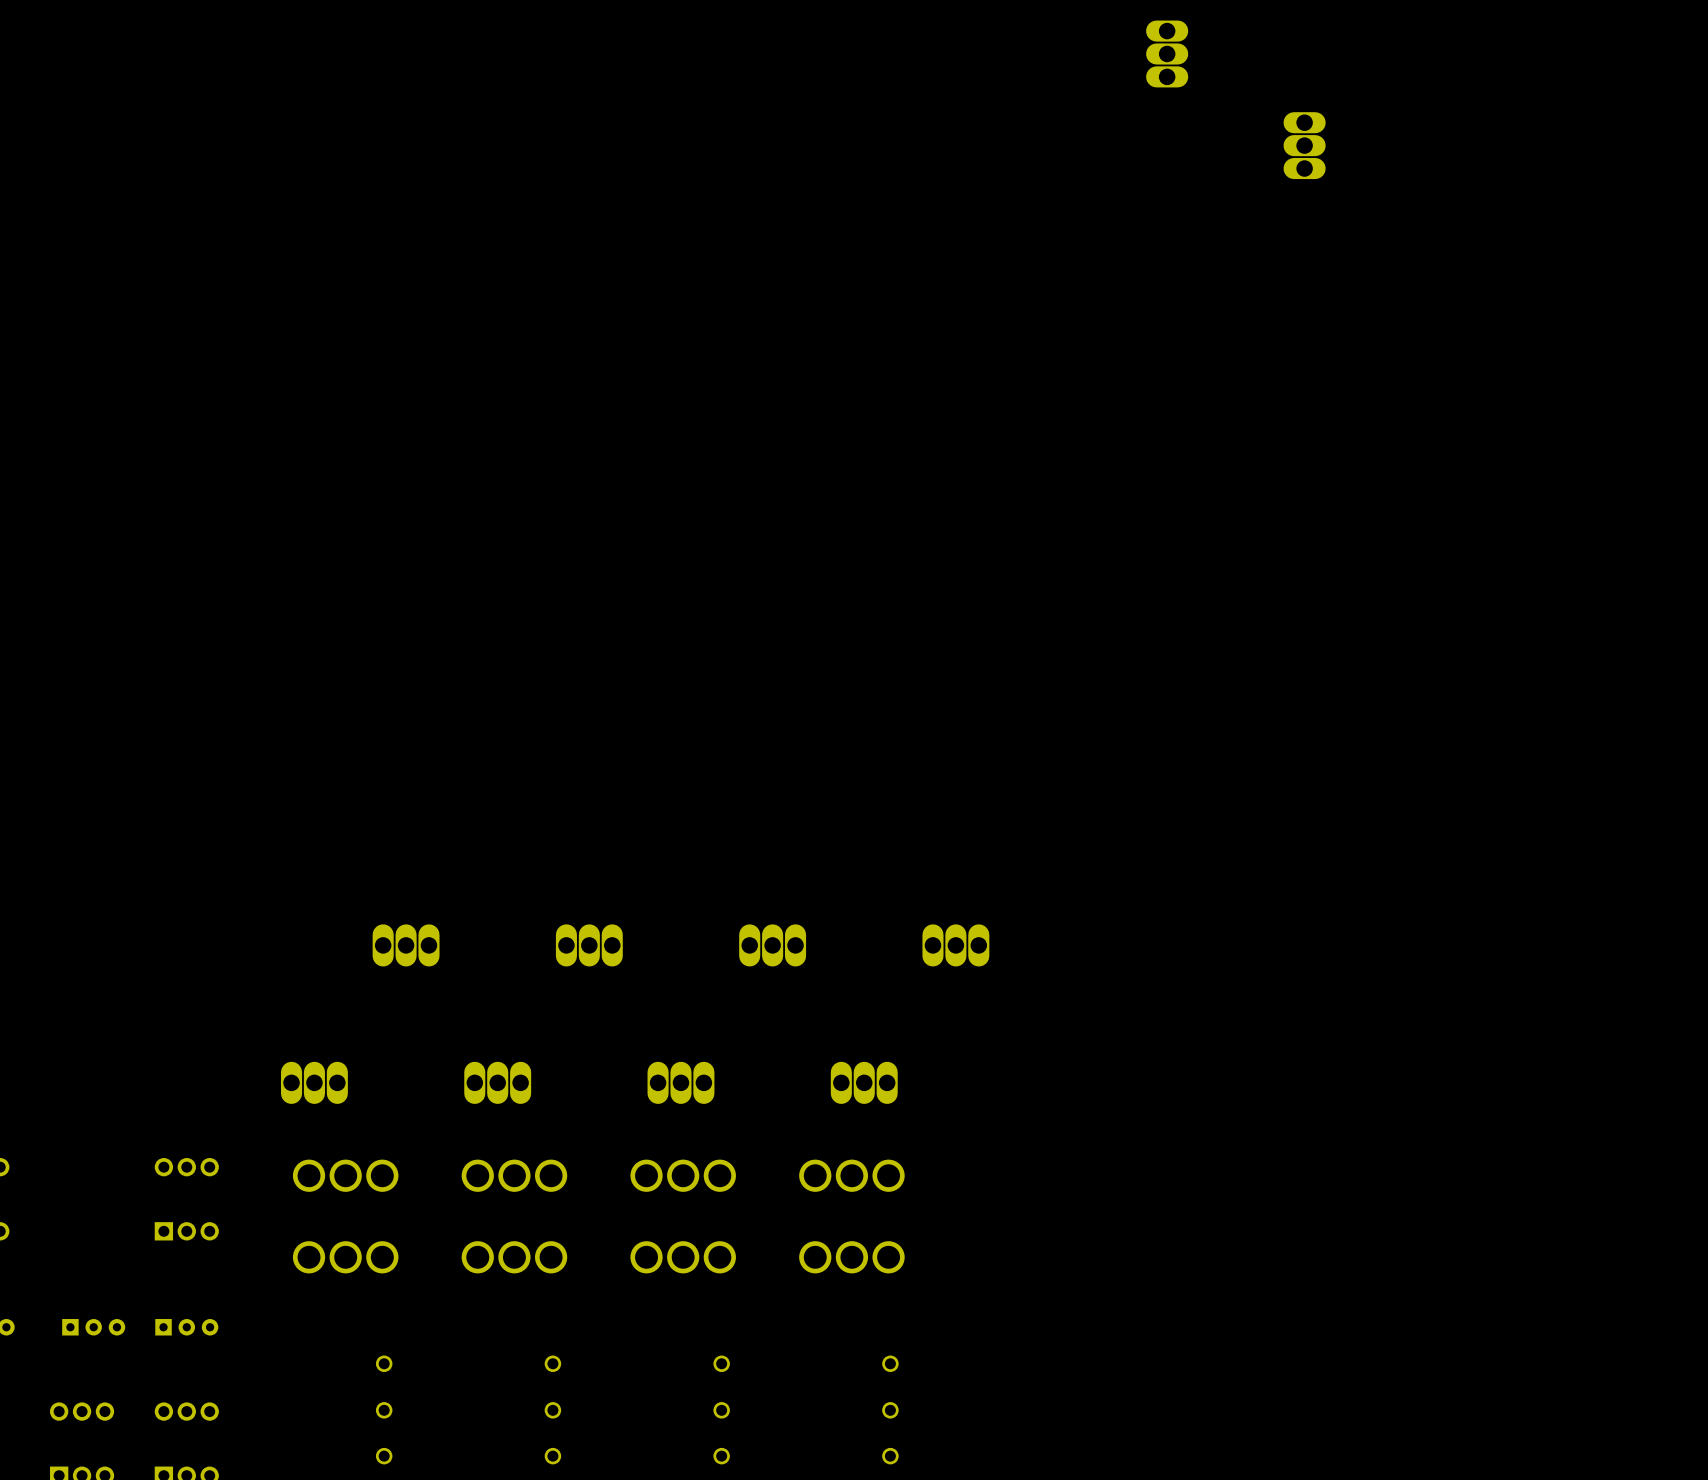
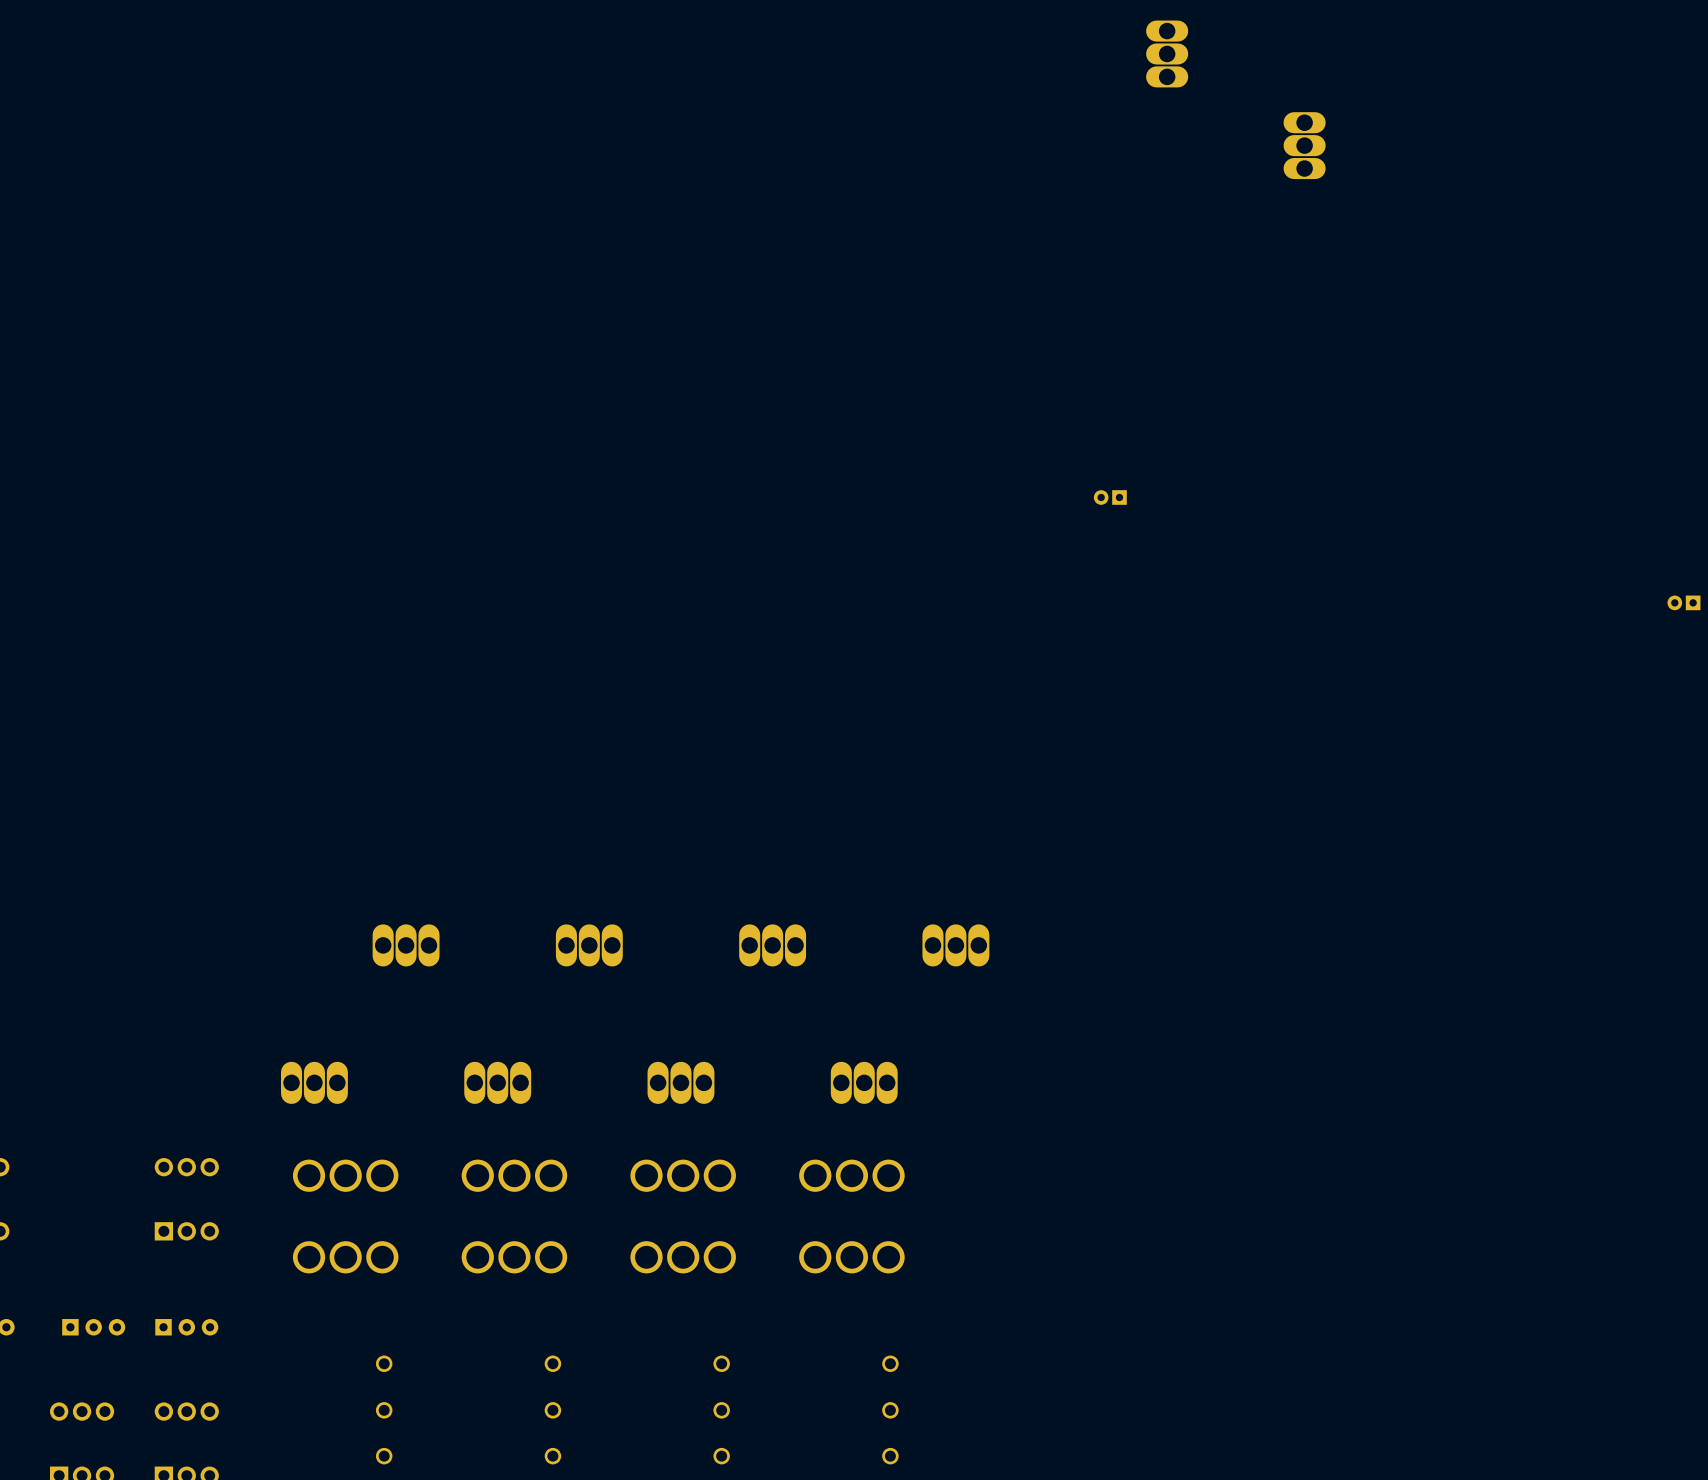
part: none -> (1110, 497)
part: none -> (1683, 602)

